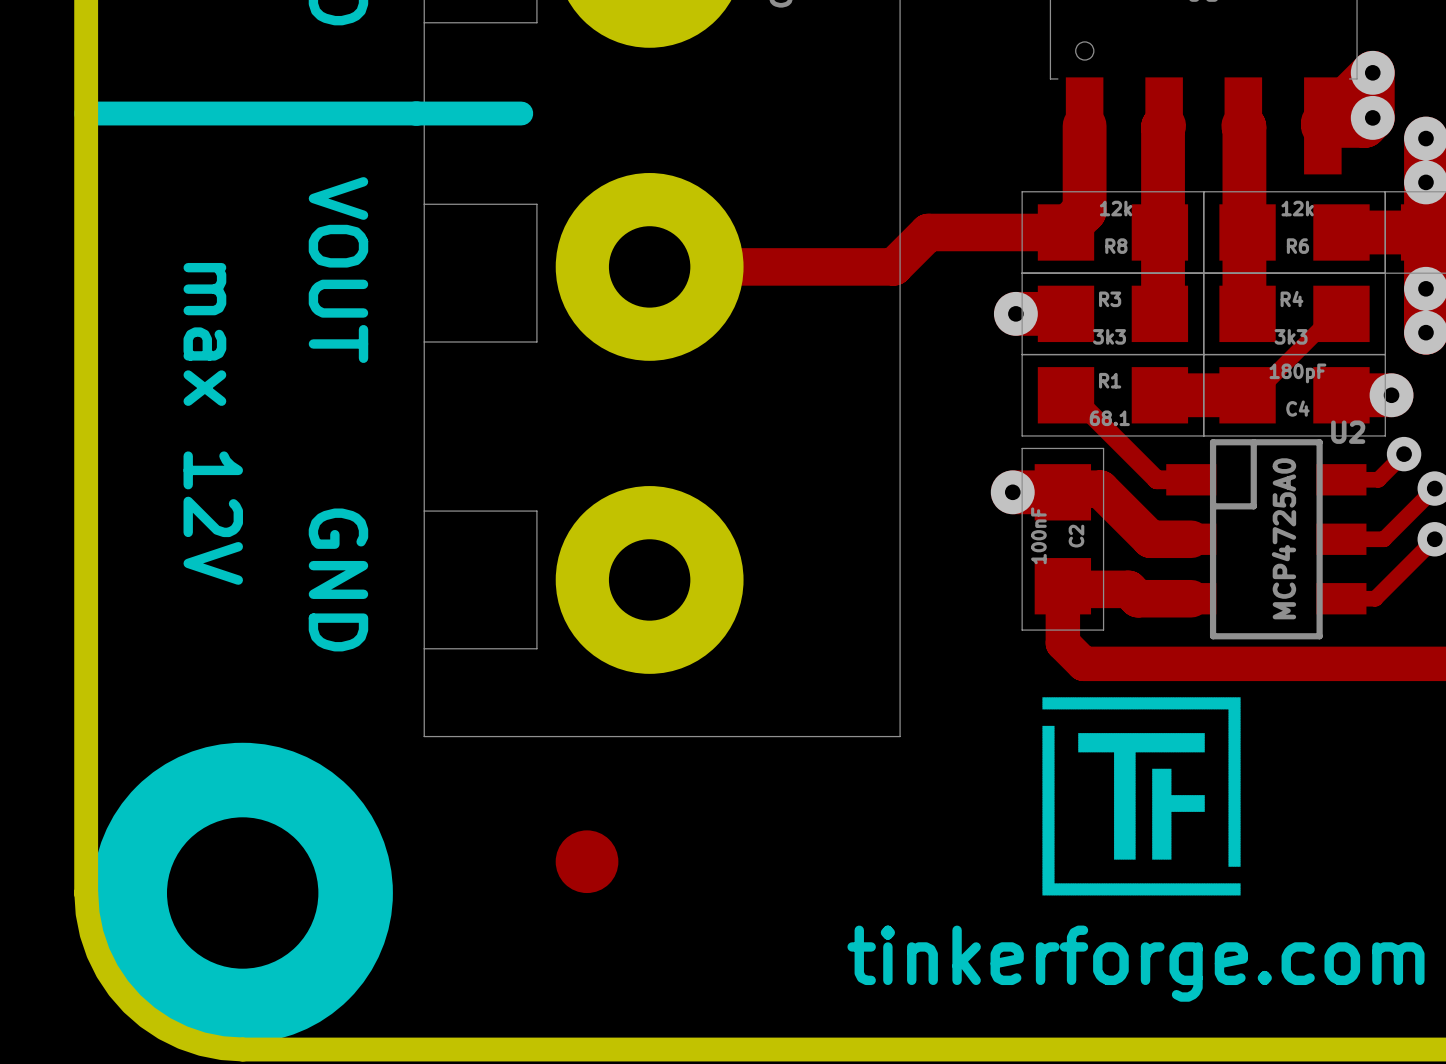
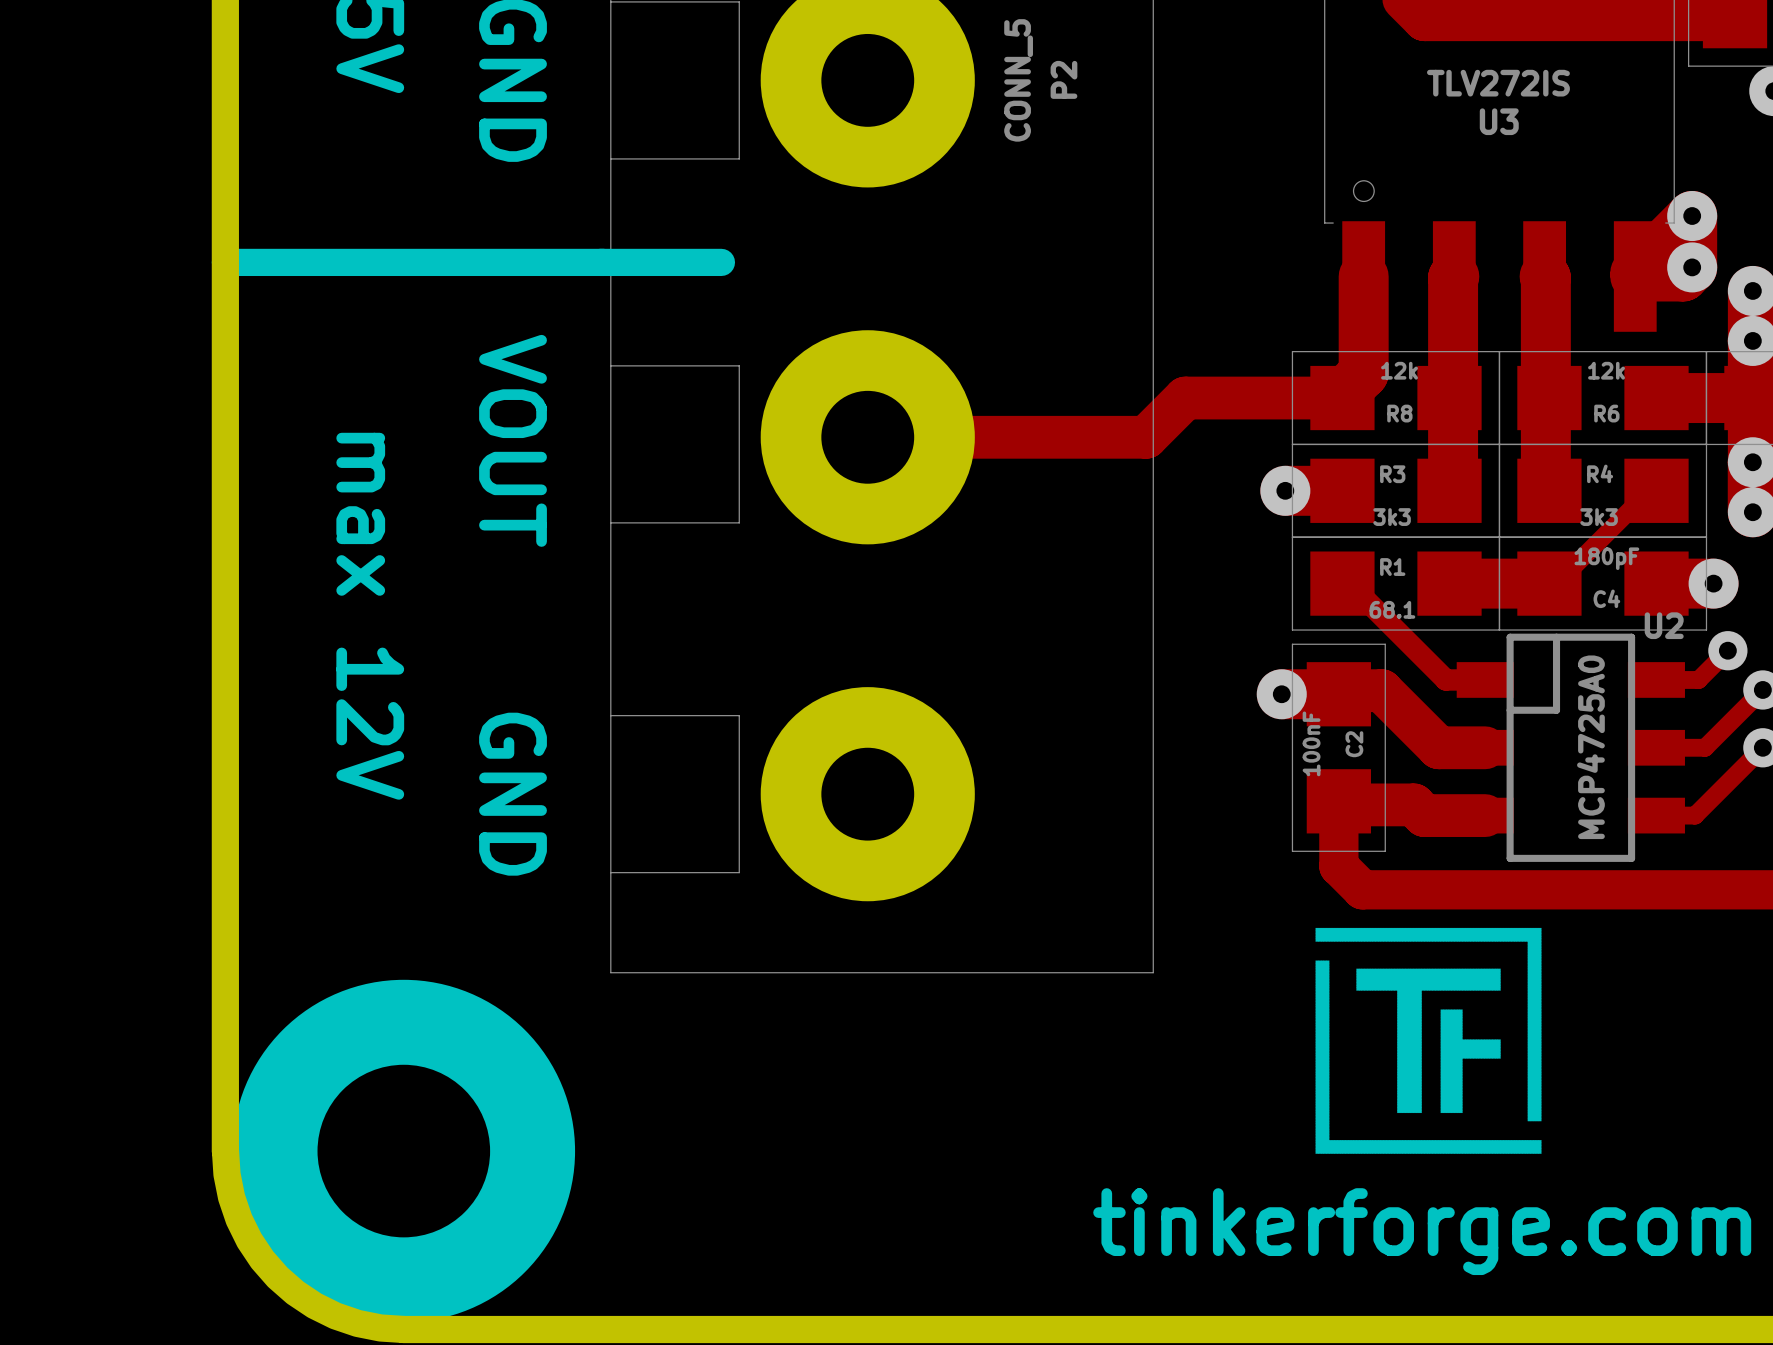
part: (587, 861) -> none

